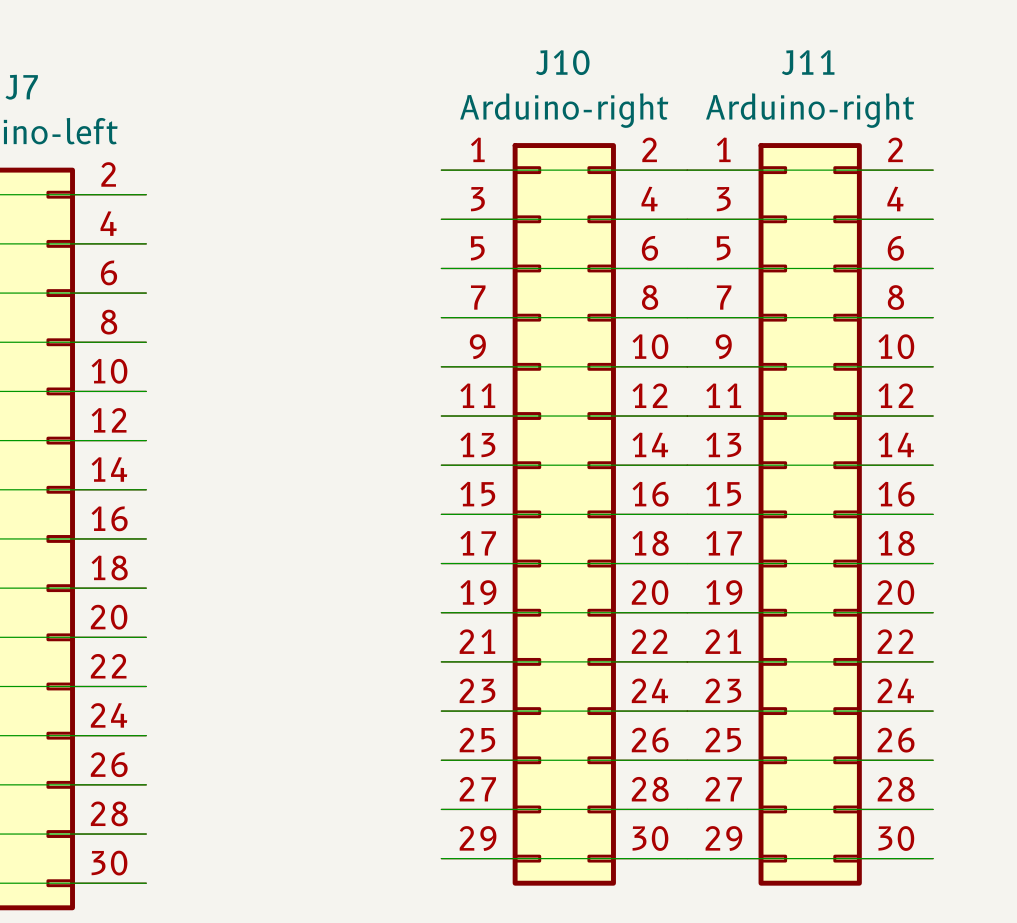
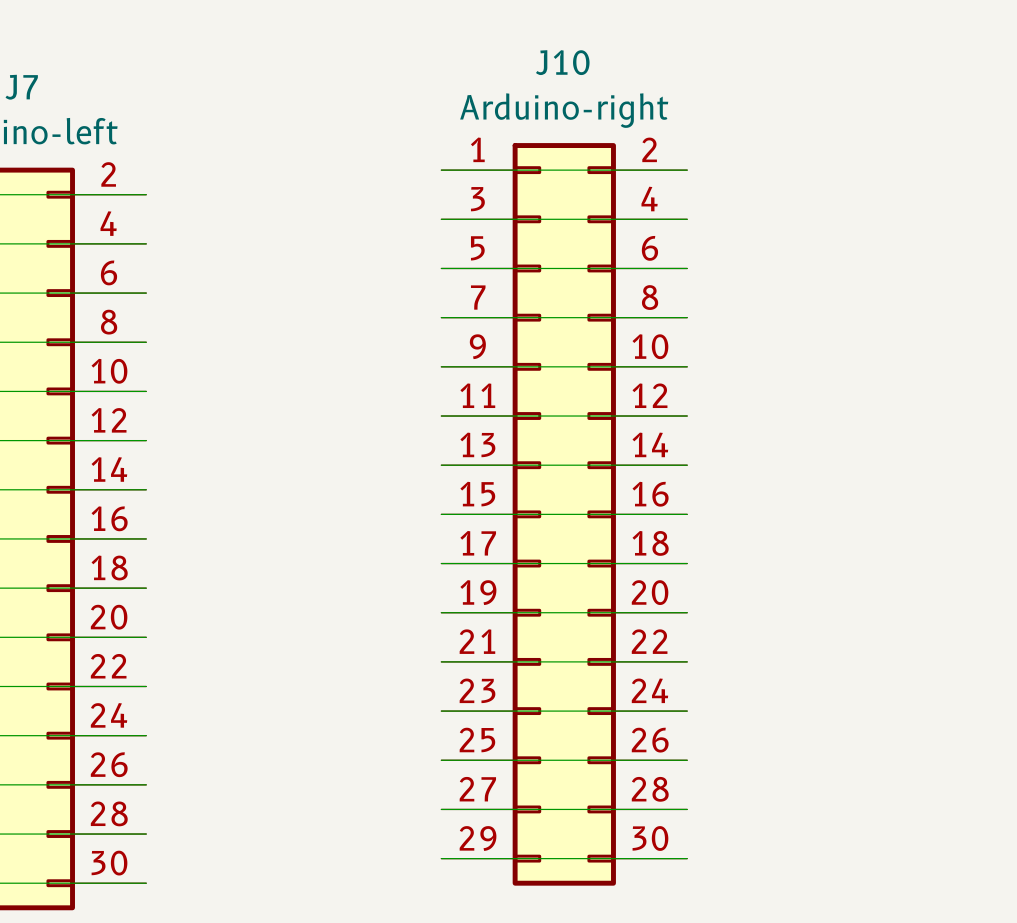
wire: (687, 170) (933, 170) -> none
wire: (687, 219) (933, 219) -> none
wire: (687, 268) (933, 268) -> none
wire: (687, 317) (933, 317) -> none
wire: (687, 366) (933, 366) -> none
wire: (687, 416) (933, 416) -> none
wire: (687, 465) (933, 465) -> none
wire: (687, 514) (933, 514) -> none
J11: Arduino-right (810, 514) -> none
wire: (687, 563) (933, 563) -> none
wire: (687, 612) (933, 612) -> none
wire: (687, 661) (933, 661) -> none
wire: (687, 711) (933, 711) -> none
wire: (687, 760) (933, 760) -> none
wire: (687, 809) (933, 809) -> none
wire: (687, 858) (933, 858) -> none

